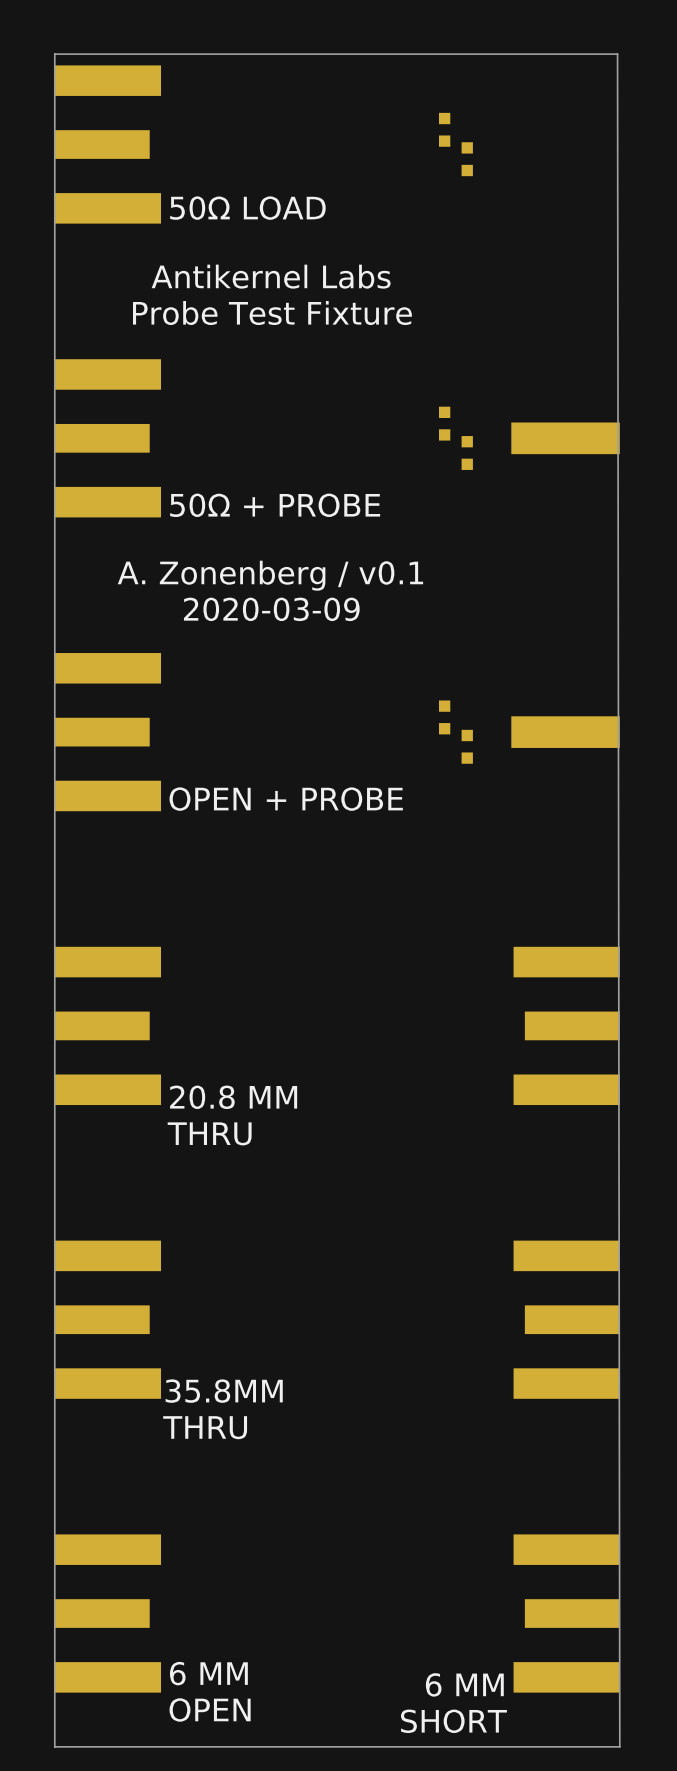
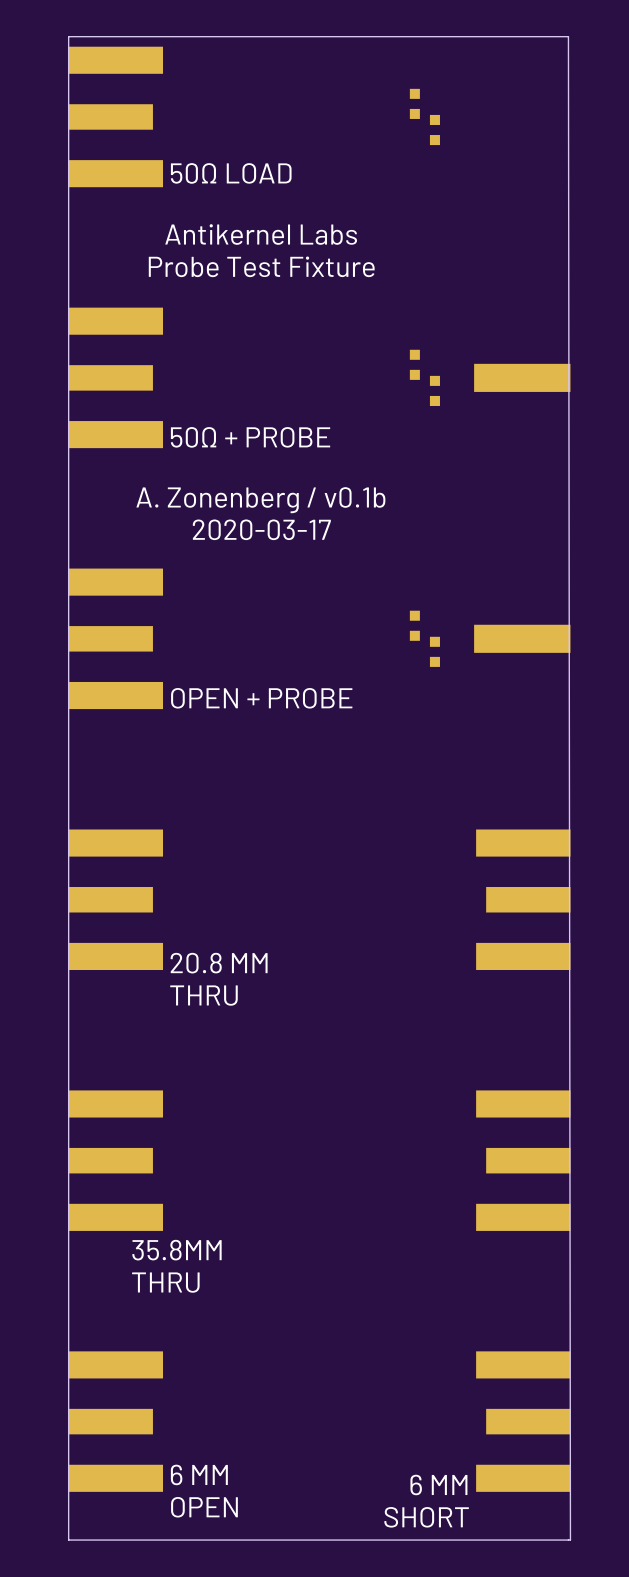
text: A. Zonenberg / v0.1 (270, 575) -> A. Zonenberg / v0.1b (260, 500)
text: 2020-03-09 (271, 609) -> 2020-03-17 (261, 529)
text position: 35.8MM (224, 1391) -> 35.8MM (176, 1250)
text position: THRU (205, 1427) -> THRU (165, 1282)

